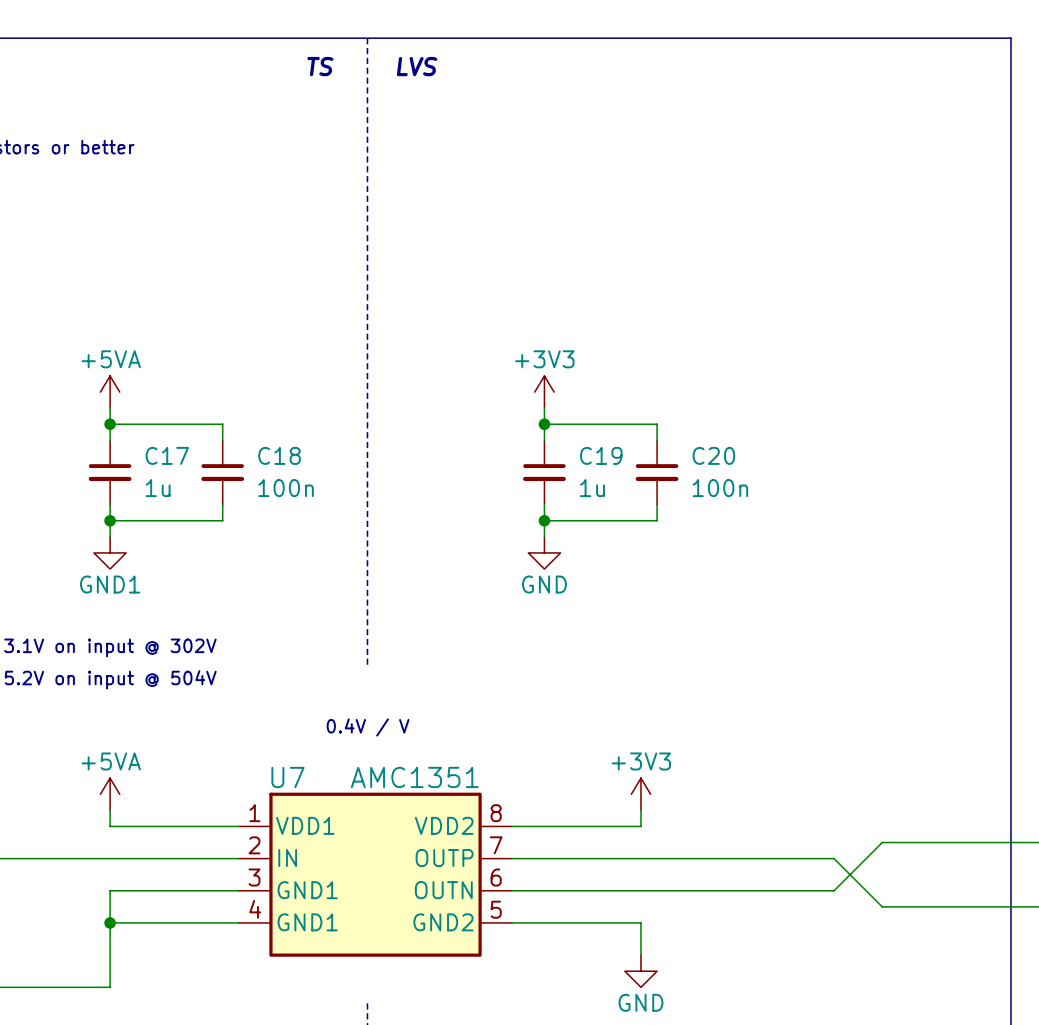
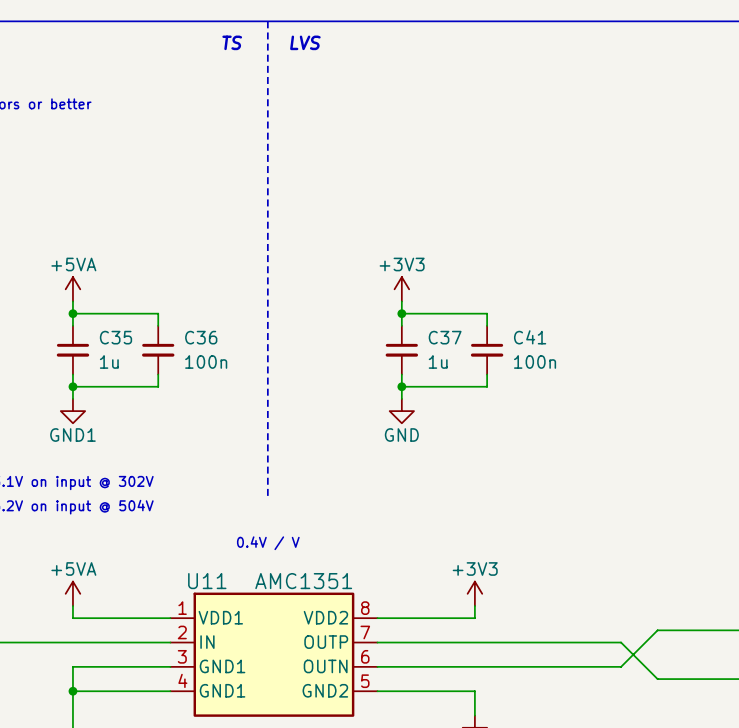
C17 name: C17 (167, 455) -> C35 (115, 337)
C18 name: C18 (279, 455) -> C36 (201, 337)
C19 name: C19 (601, 455) -> C37 (445, 337)
C20 name: C20 (713, 455) -> C41 (530, 337)
U7 name: U7 (287, 777) -> U11 (207, 581)

